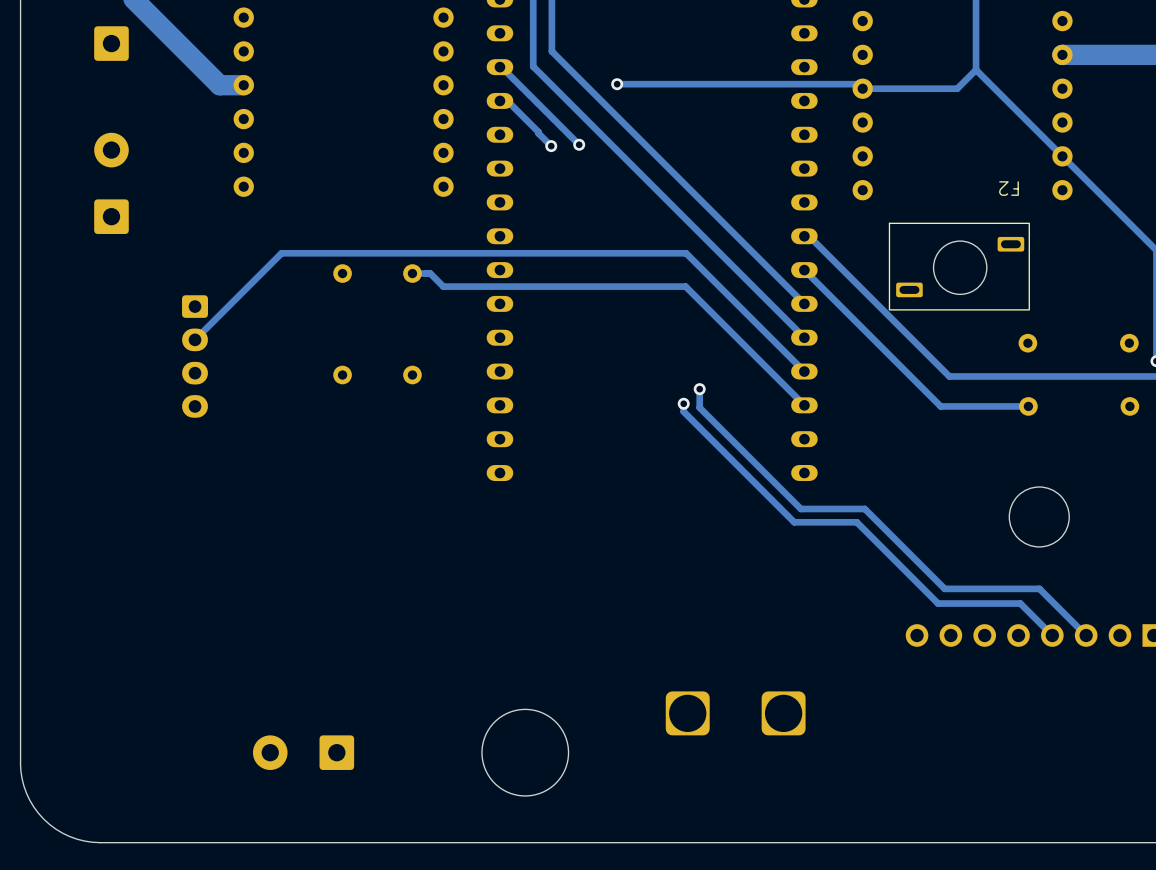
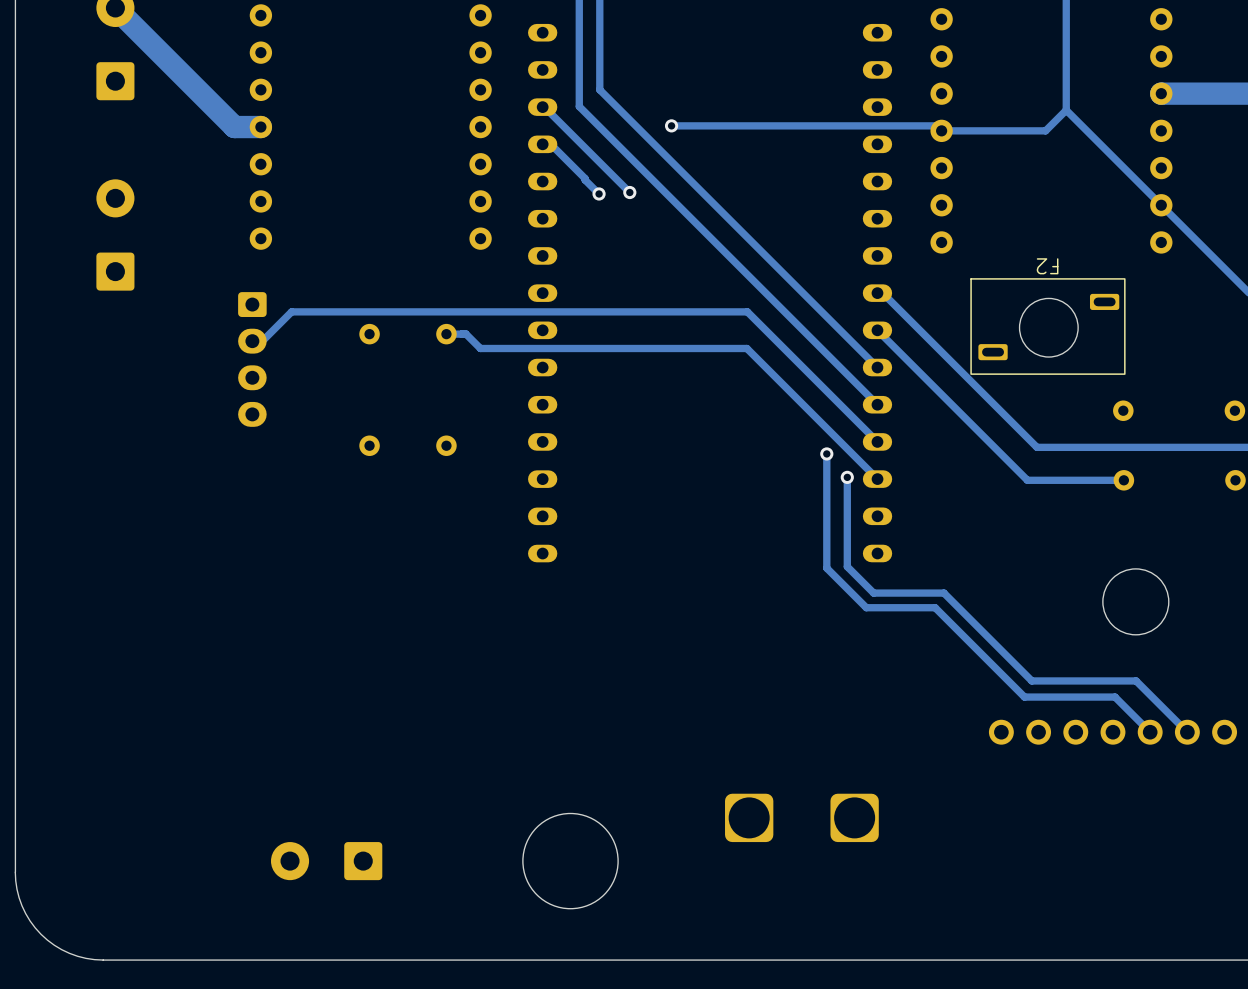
F2 name position: F2 (1009, 188) -> F2 (1047, 266)
track: (281, 253) (195, 339) -> (302, 311) (291, 311) (262, 341) (252, 341)
part position: (195, 356) -> (252, 359)
via: none -> (826, 453)
track: (699, 389) (699, 407) (776, 485) -> (847, 477) (847, 566)
via: (699, 389) -> none
track: (683, 403) (683, 411) (758, 486) -> (826, 453) (826, 568)
via: (683, 403) -> none
via: none -> (847, 477)

